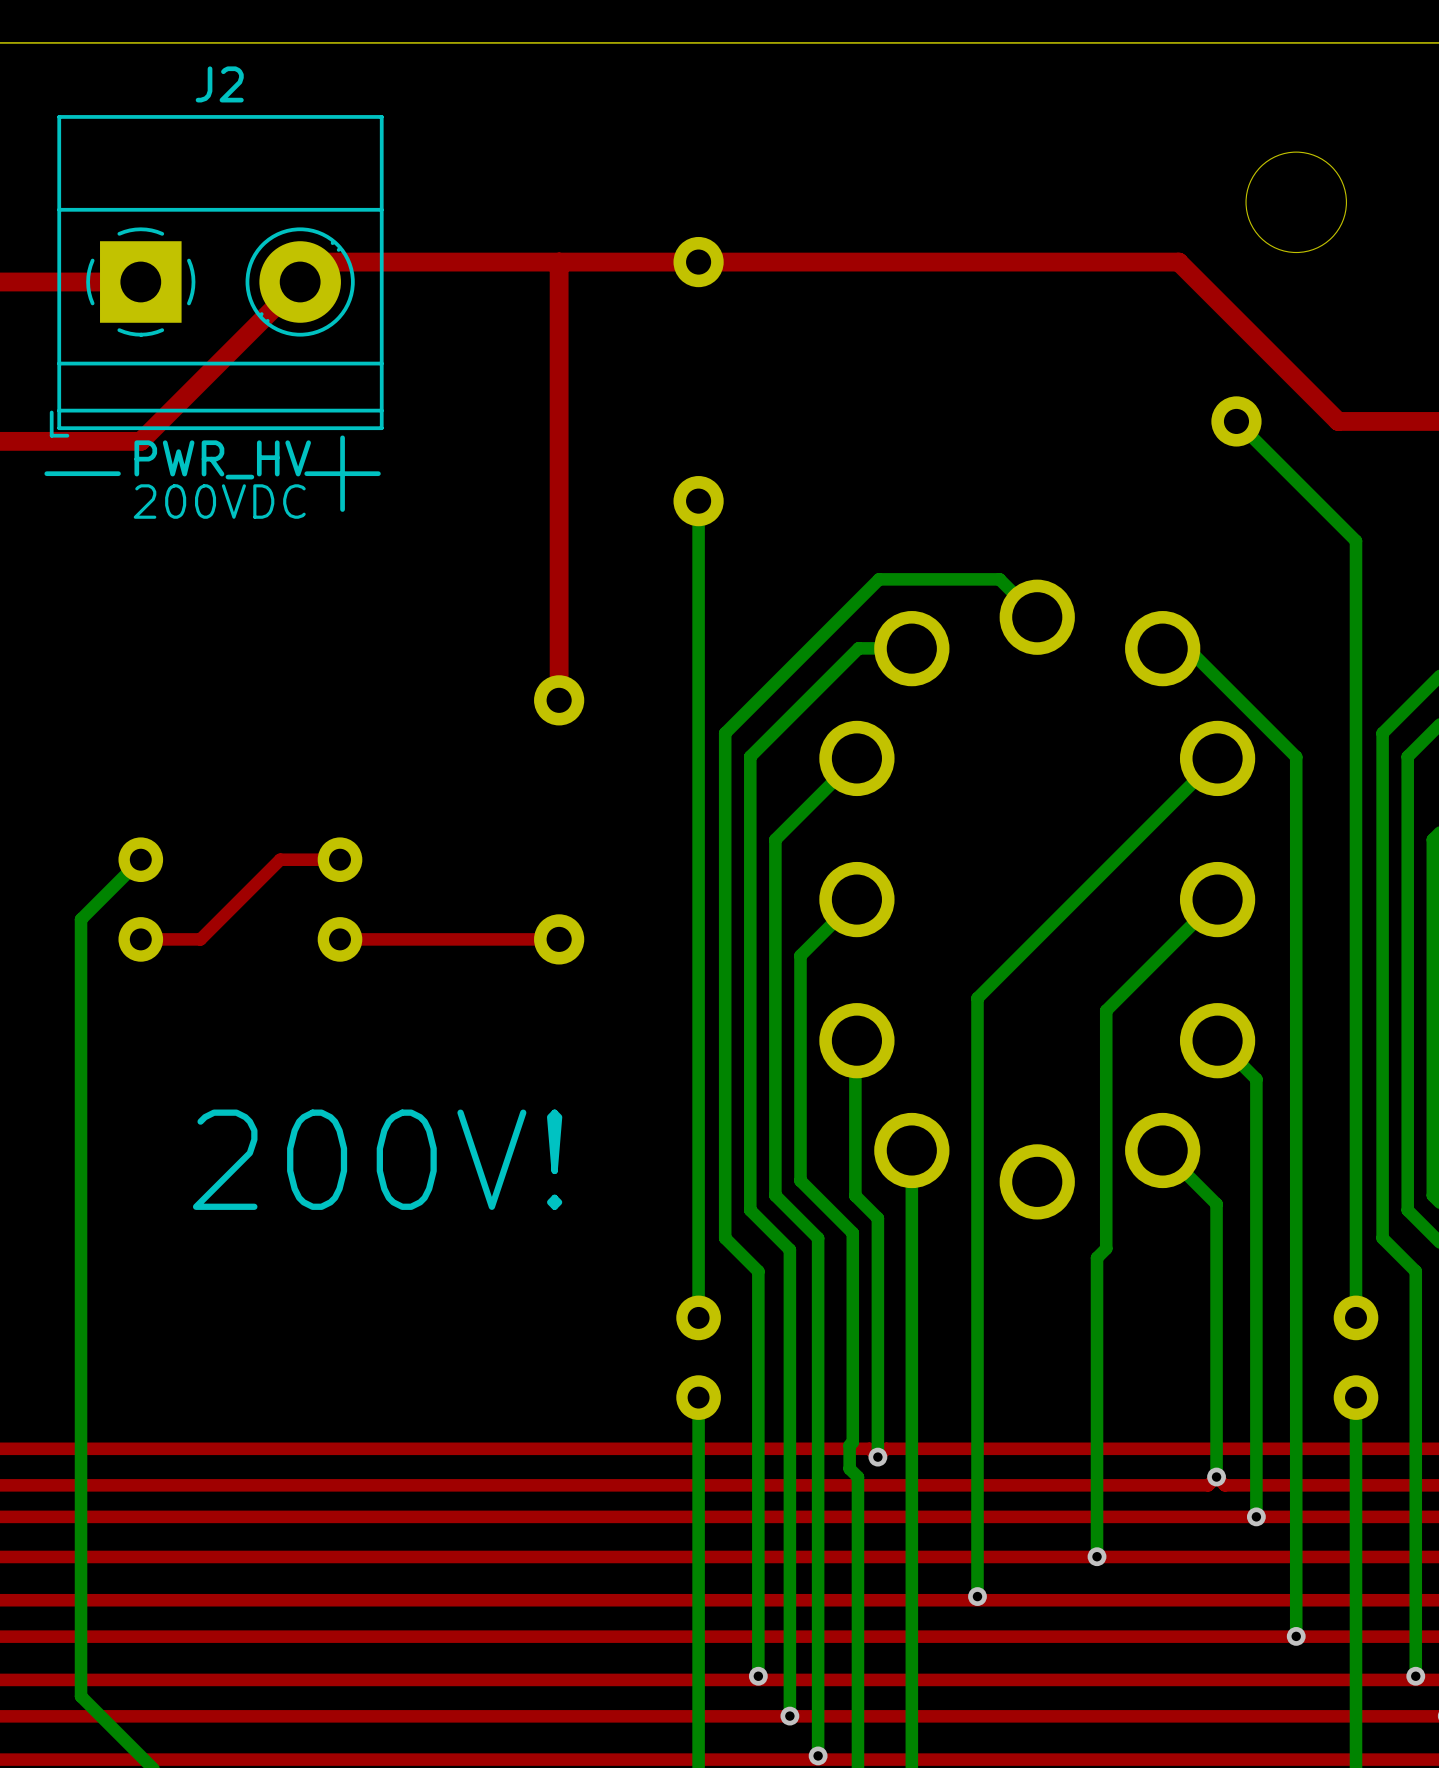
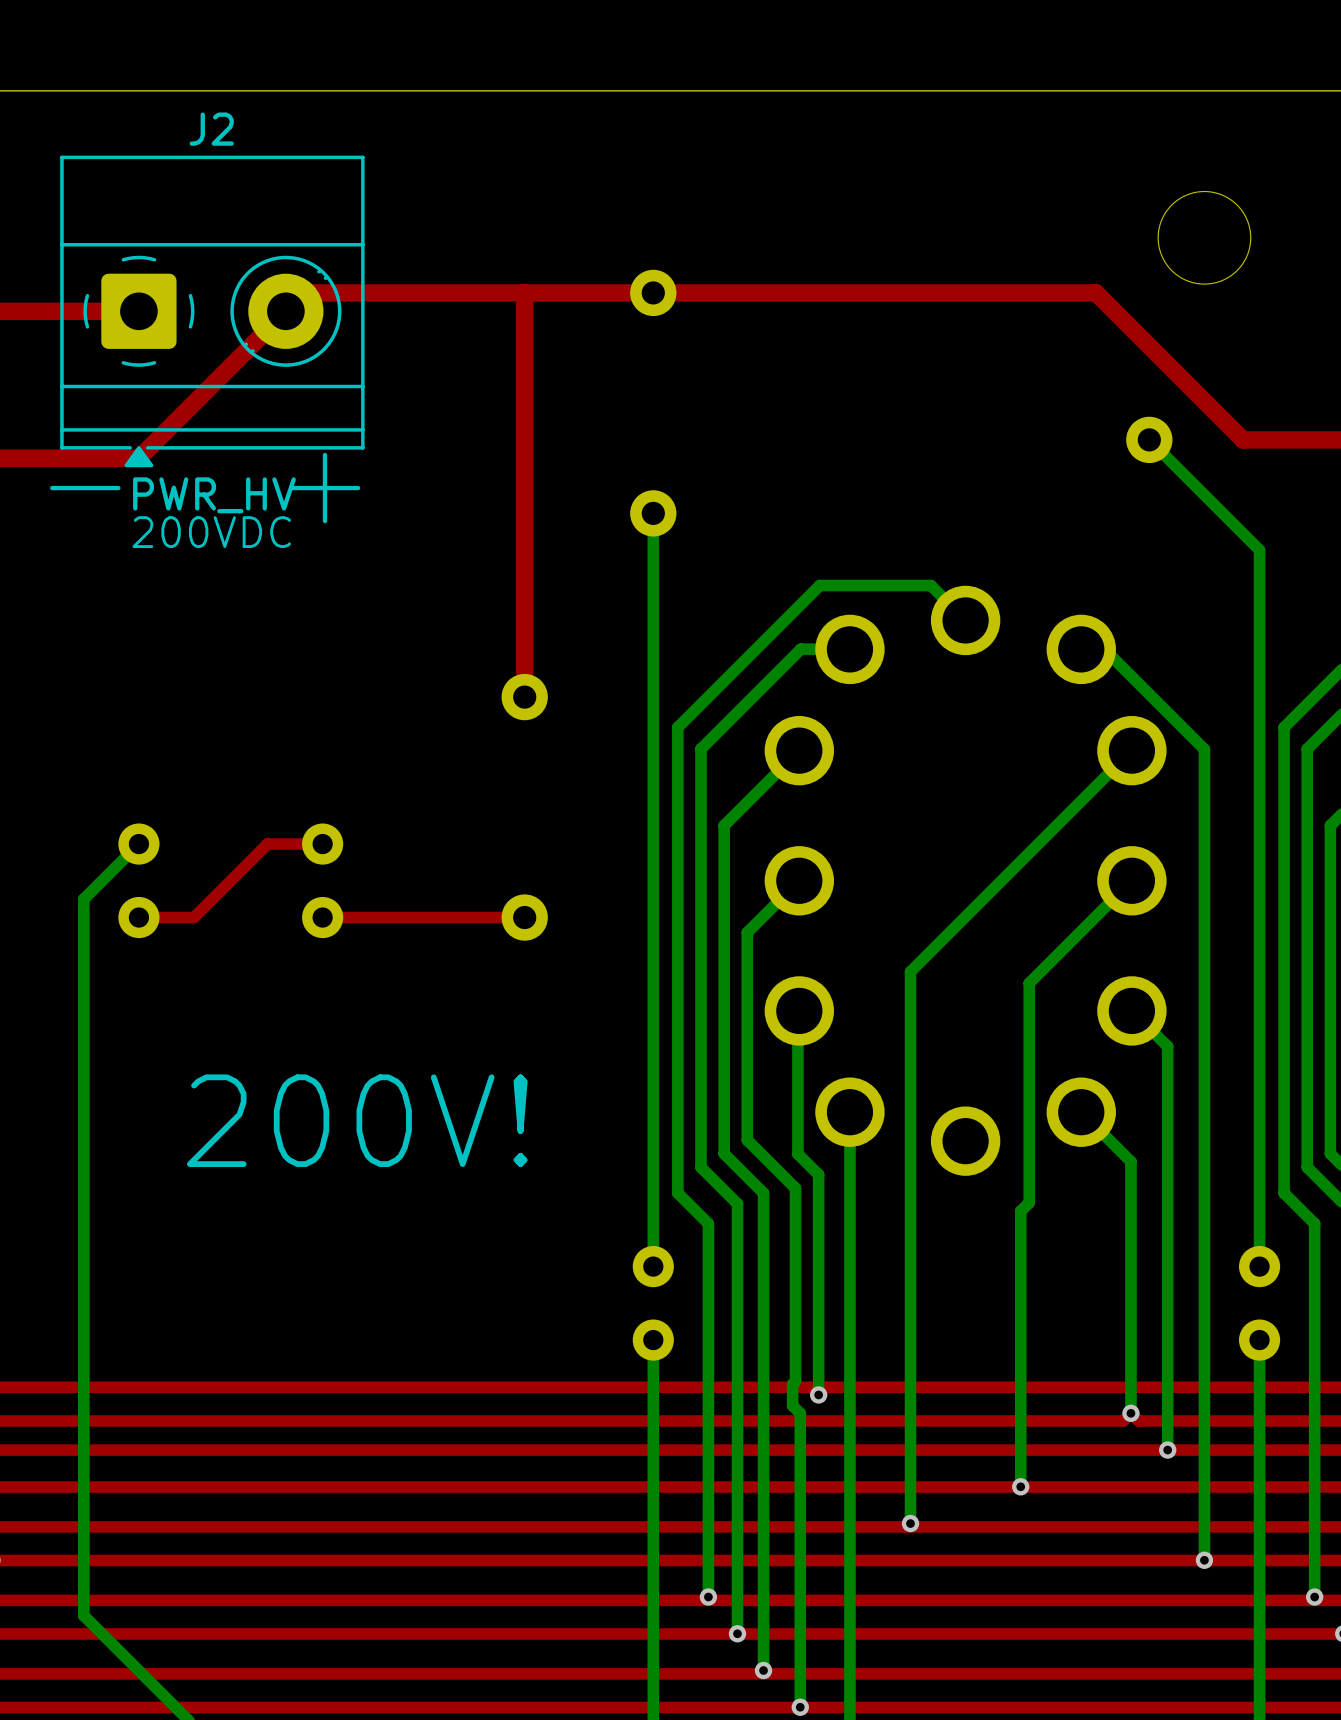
J2 footprint: [49, 115, 384, 438] -> [60, 155, 365, 468]
J2 value position: PWR_HV (222, 459) -> PWR_HV (214, 495)
text position: 200VDC (219, 501) -> 200VDC (211, 532)

